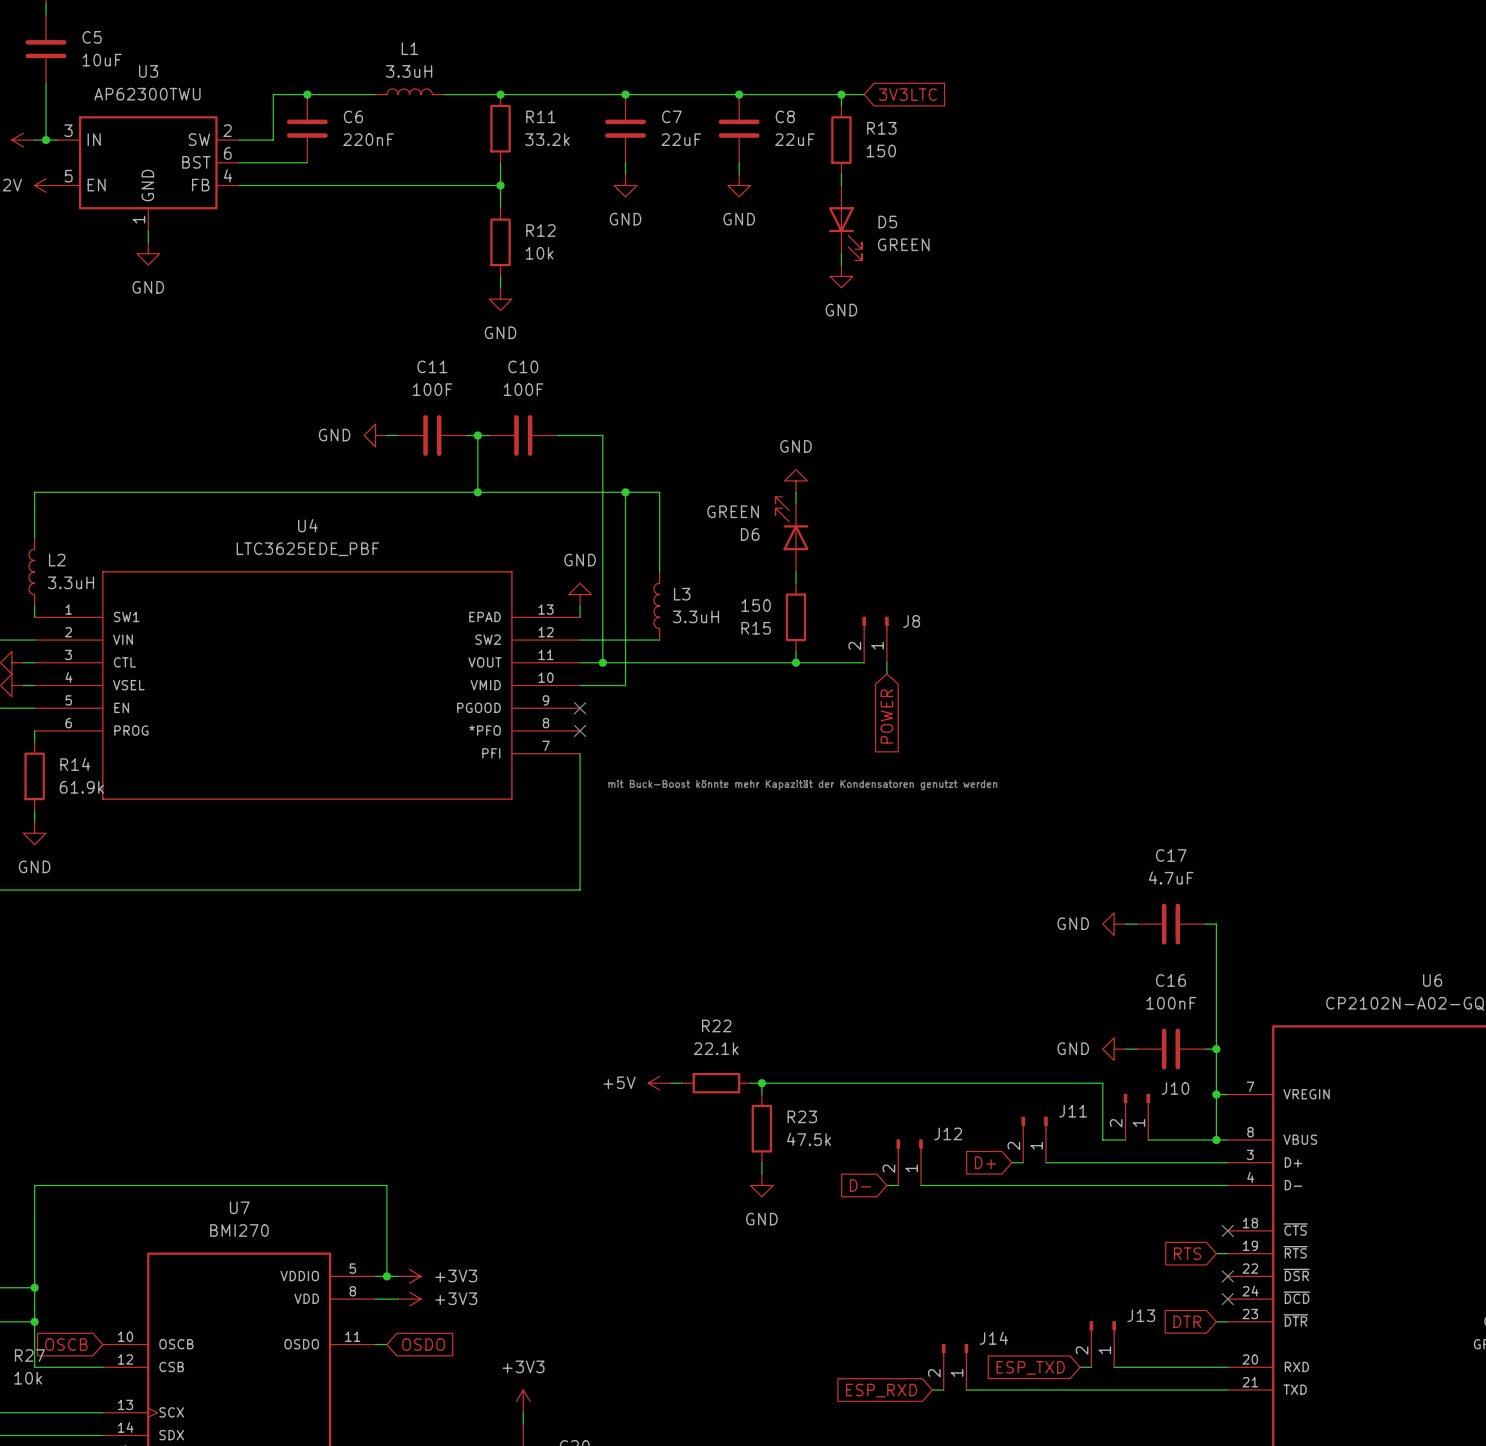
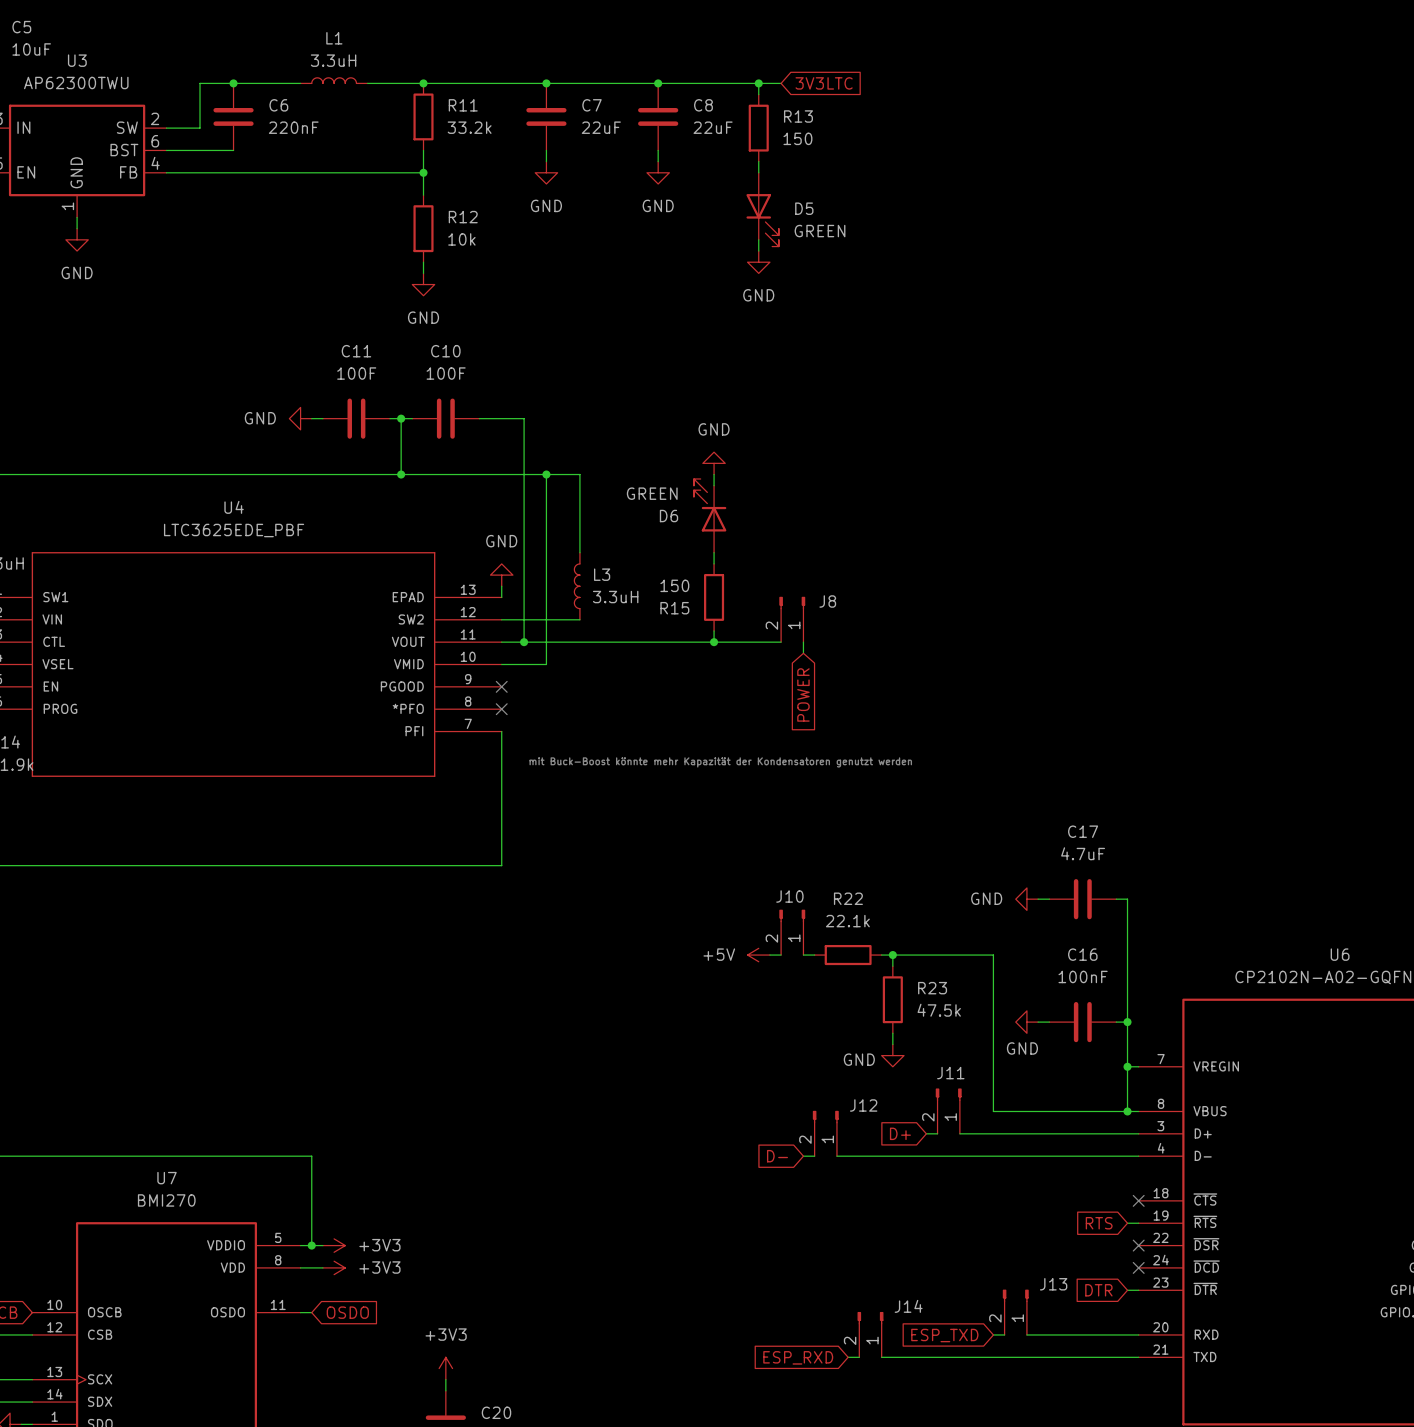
wire: none -> (803, 955) (814, 955)
wire: none -> (892, 955) (892, 966)
junction: none -> (892, 955)
power symbol text position: GND (1073, 1048) -> GND (1022, 1048)
power symbol position: +5V (659, 1083) -> +5V (758, 955)
wire: (670, 1083) (682, 1083) -> (769, 955) (781, 955)
R22 position: (716, 1083) -> (848, 955)
wire: (750, 1083) (1102, 1083) (1102, 1140) -> (881, 955) (993, 955) (993, 1111) (1015, 1111)
wire: (761, 1083) (761, 1094) -> (892, 1033) (892, 1044)
junction: (761, 1083) -> none
power symbol: none -> GND (892, 1055)
J10 name position: J10 (1175, 1088) -> J10 (789, 896)
J11 name position: J11 (1073, 1111) -> J11 (950, 1073)
J10 position: (1136, 1116) -> (792, 932)
R23 position: (761, 1128) -> (892, 999)
wire: none -> (1038, 1111) (1060, 1111)
wire: (761, 1162) (761, 1174) -> none
power symbol: GND (761, 1185) -> none

